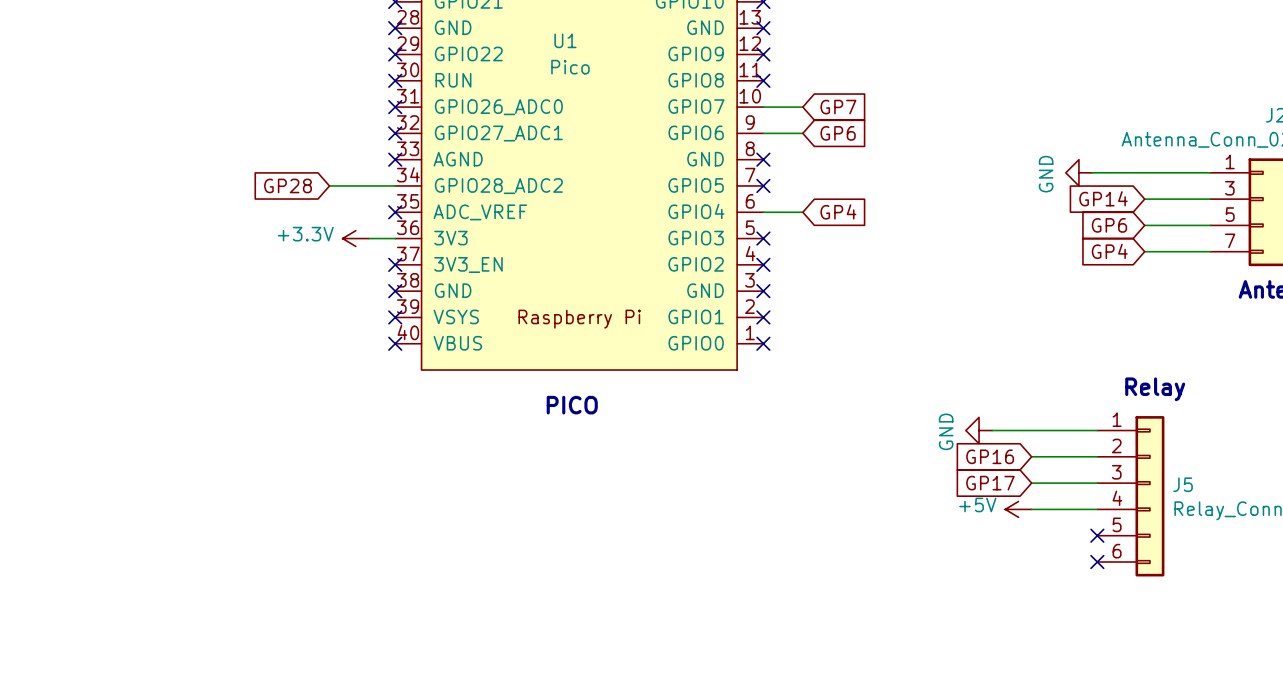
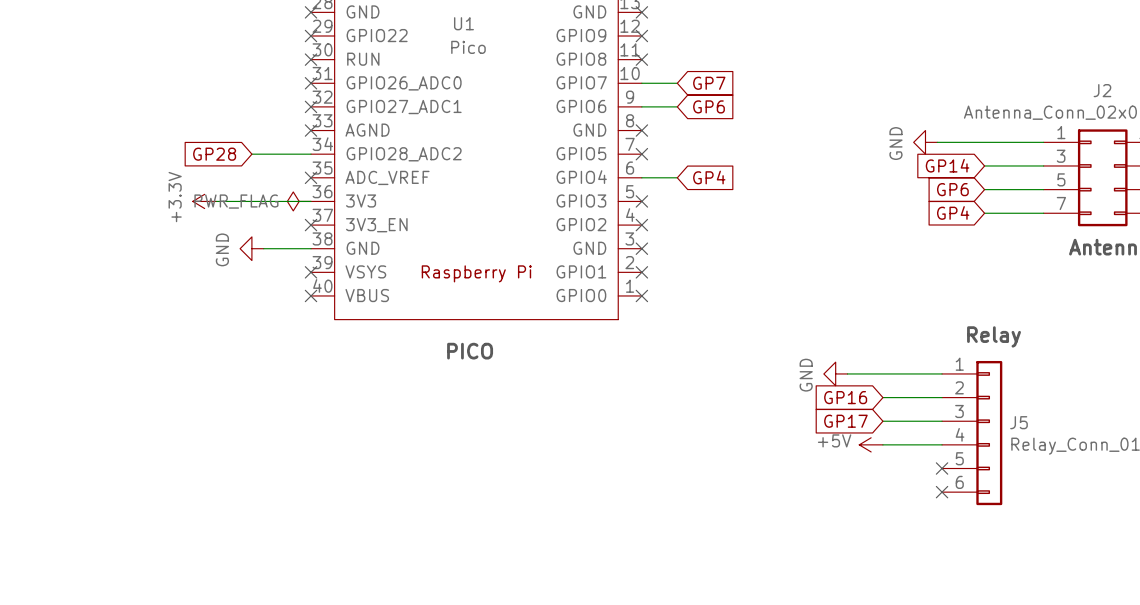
power symbol text rotation: 0° (305, 234) -> 90° counterclockwise (175, 197)
wire: none -> (216, 201) (287, 201)
power symbol position: +3.3V (355, 238) -> +3.3V (204, 201)
power symbol: none -> PWR_FLAG (299, 201)
power symbol: none -> GND (251, 248)
wire: none -> (263, 248) (311, 248)
no-connect mark: (395, 291) -> none

